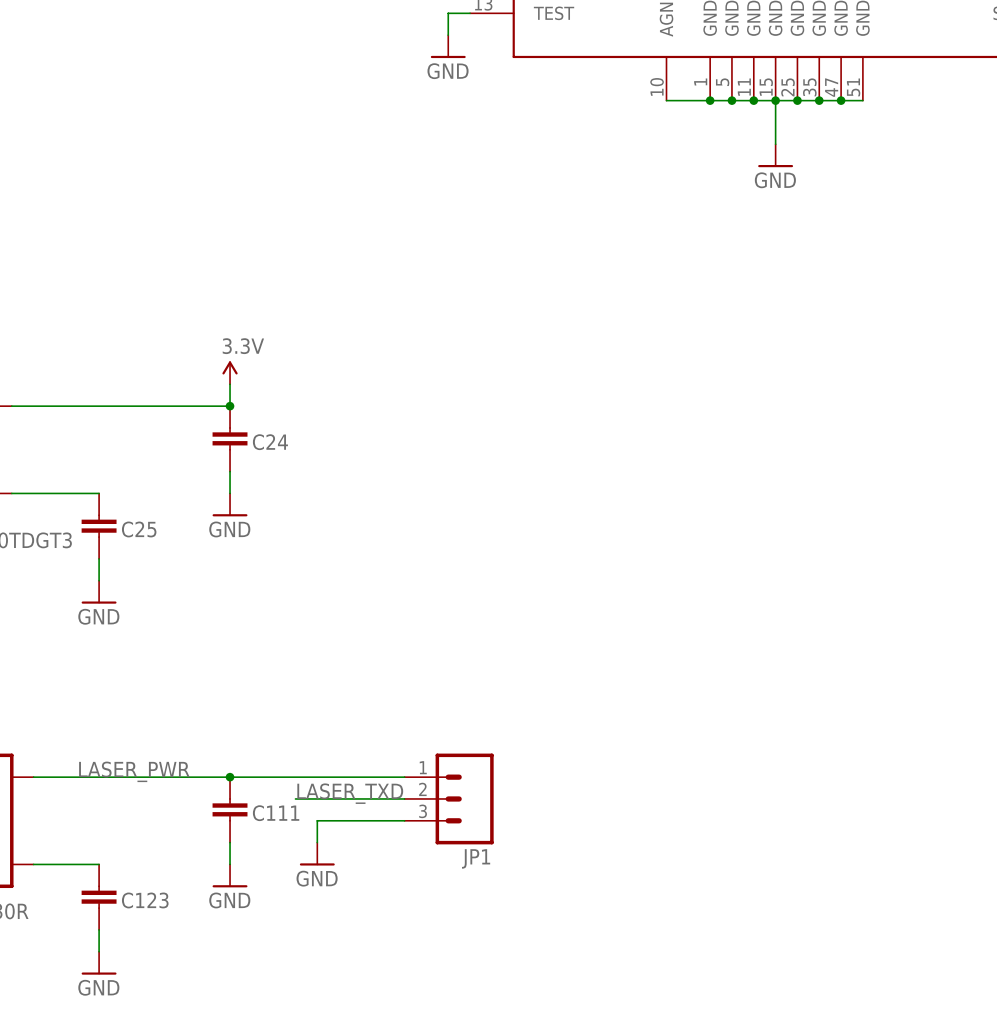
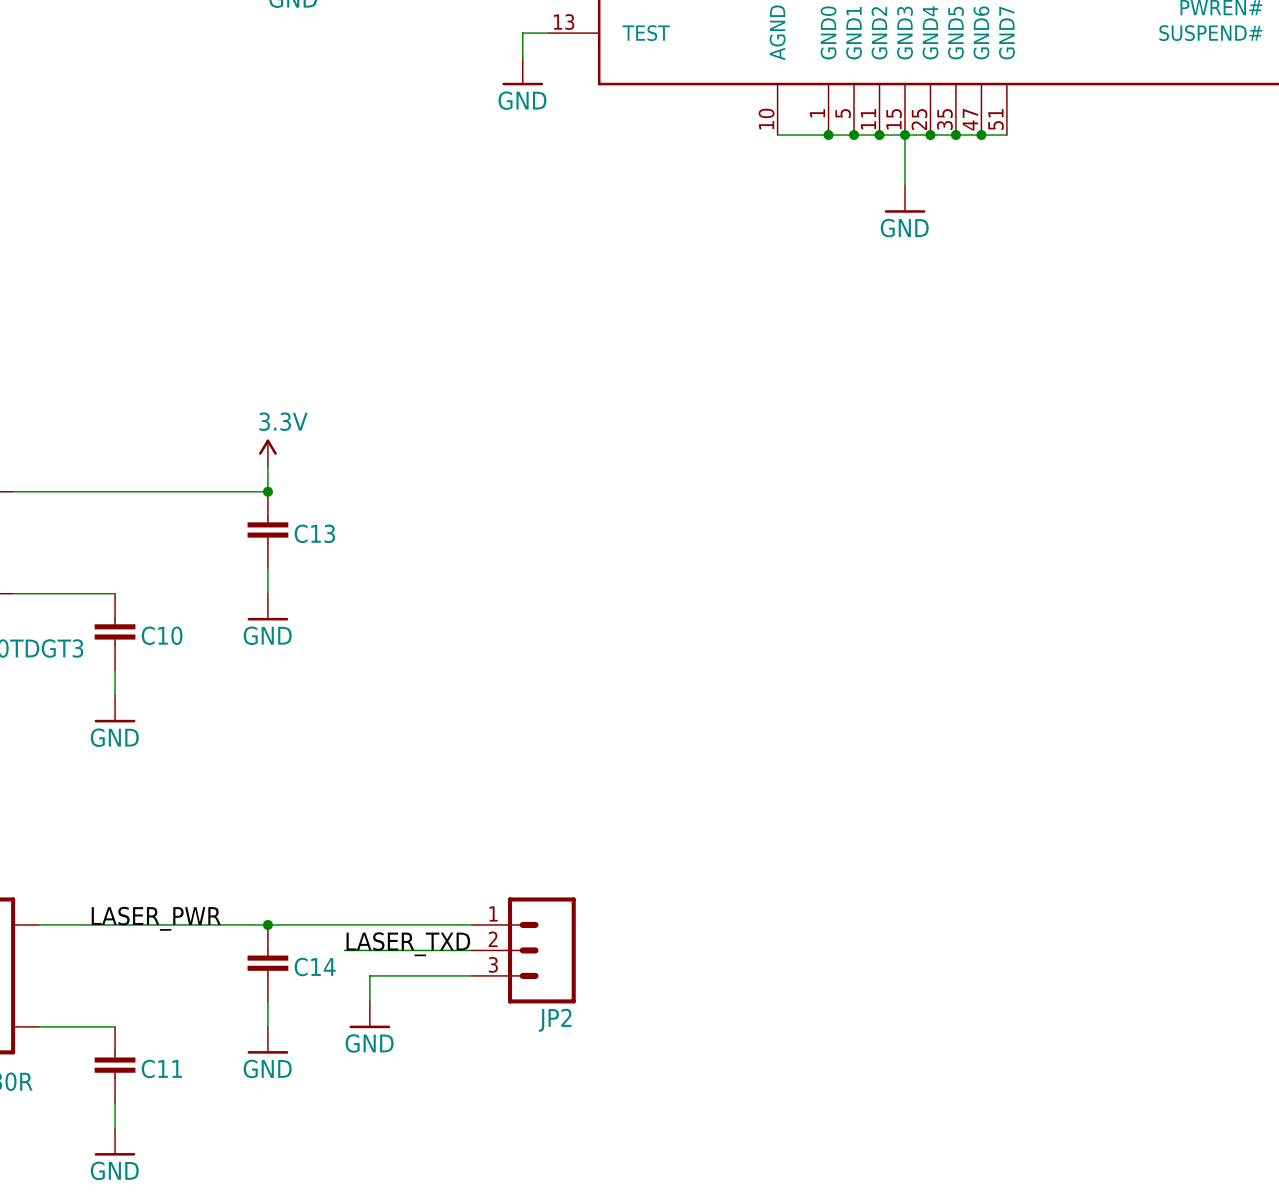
C24 name: C24 (270, 442) -> C13 (314, 533)
C25 name: C25 (139, 529) -> C10 (162, 635)
C111 name: C111 (276, 813) -> C14 (315, 967)
JP1 name: JP1 (476, 858) -> JP2 (555, 1020)
C123 name: C123 (145, 900) -> C11 (161, 1068)

